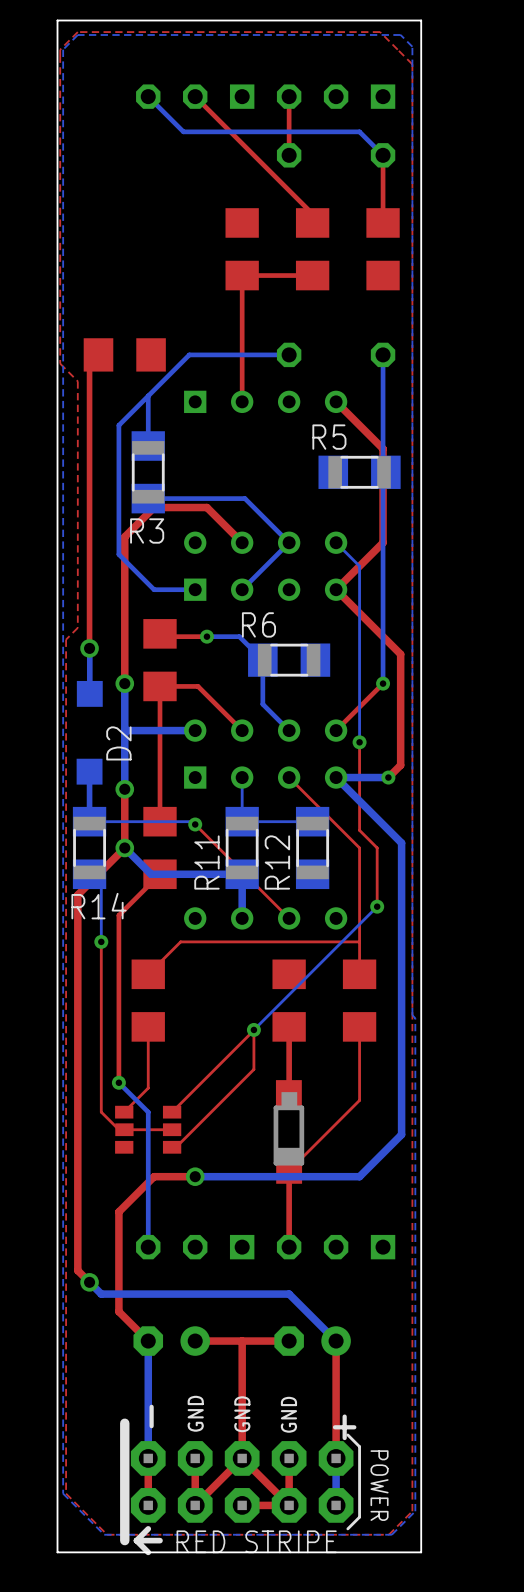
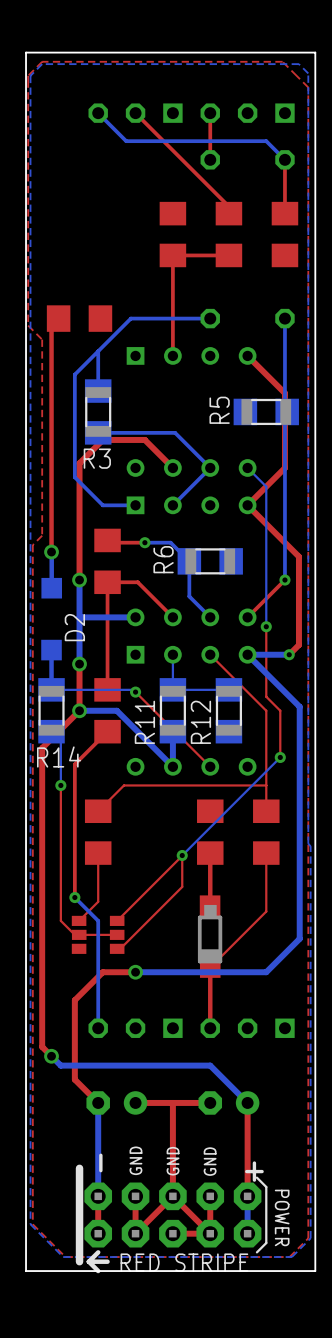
R5 name rotation: 0° (329, 437) -> 90° counterclockwise (219, 410)
R6 name rotation: 0° (258, 624) -> 90° counterclockwise (163, 559)
bottom track: (124, 847) (151, 874) (242, 874) -> (79, 710) (116, 710) (172, 766)

